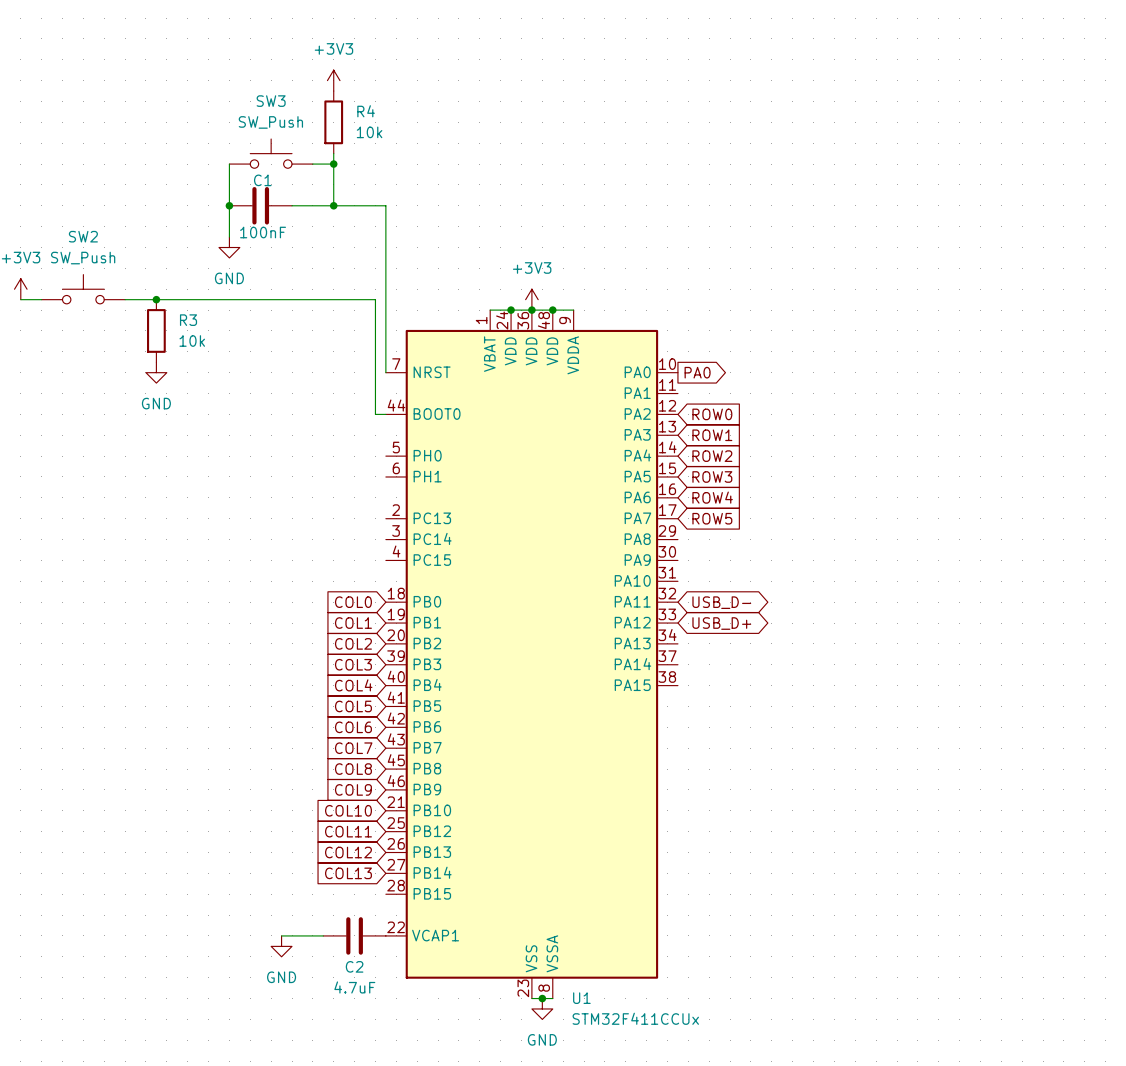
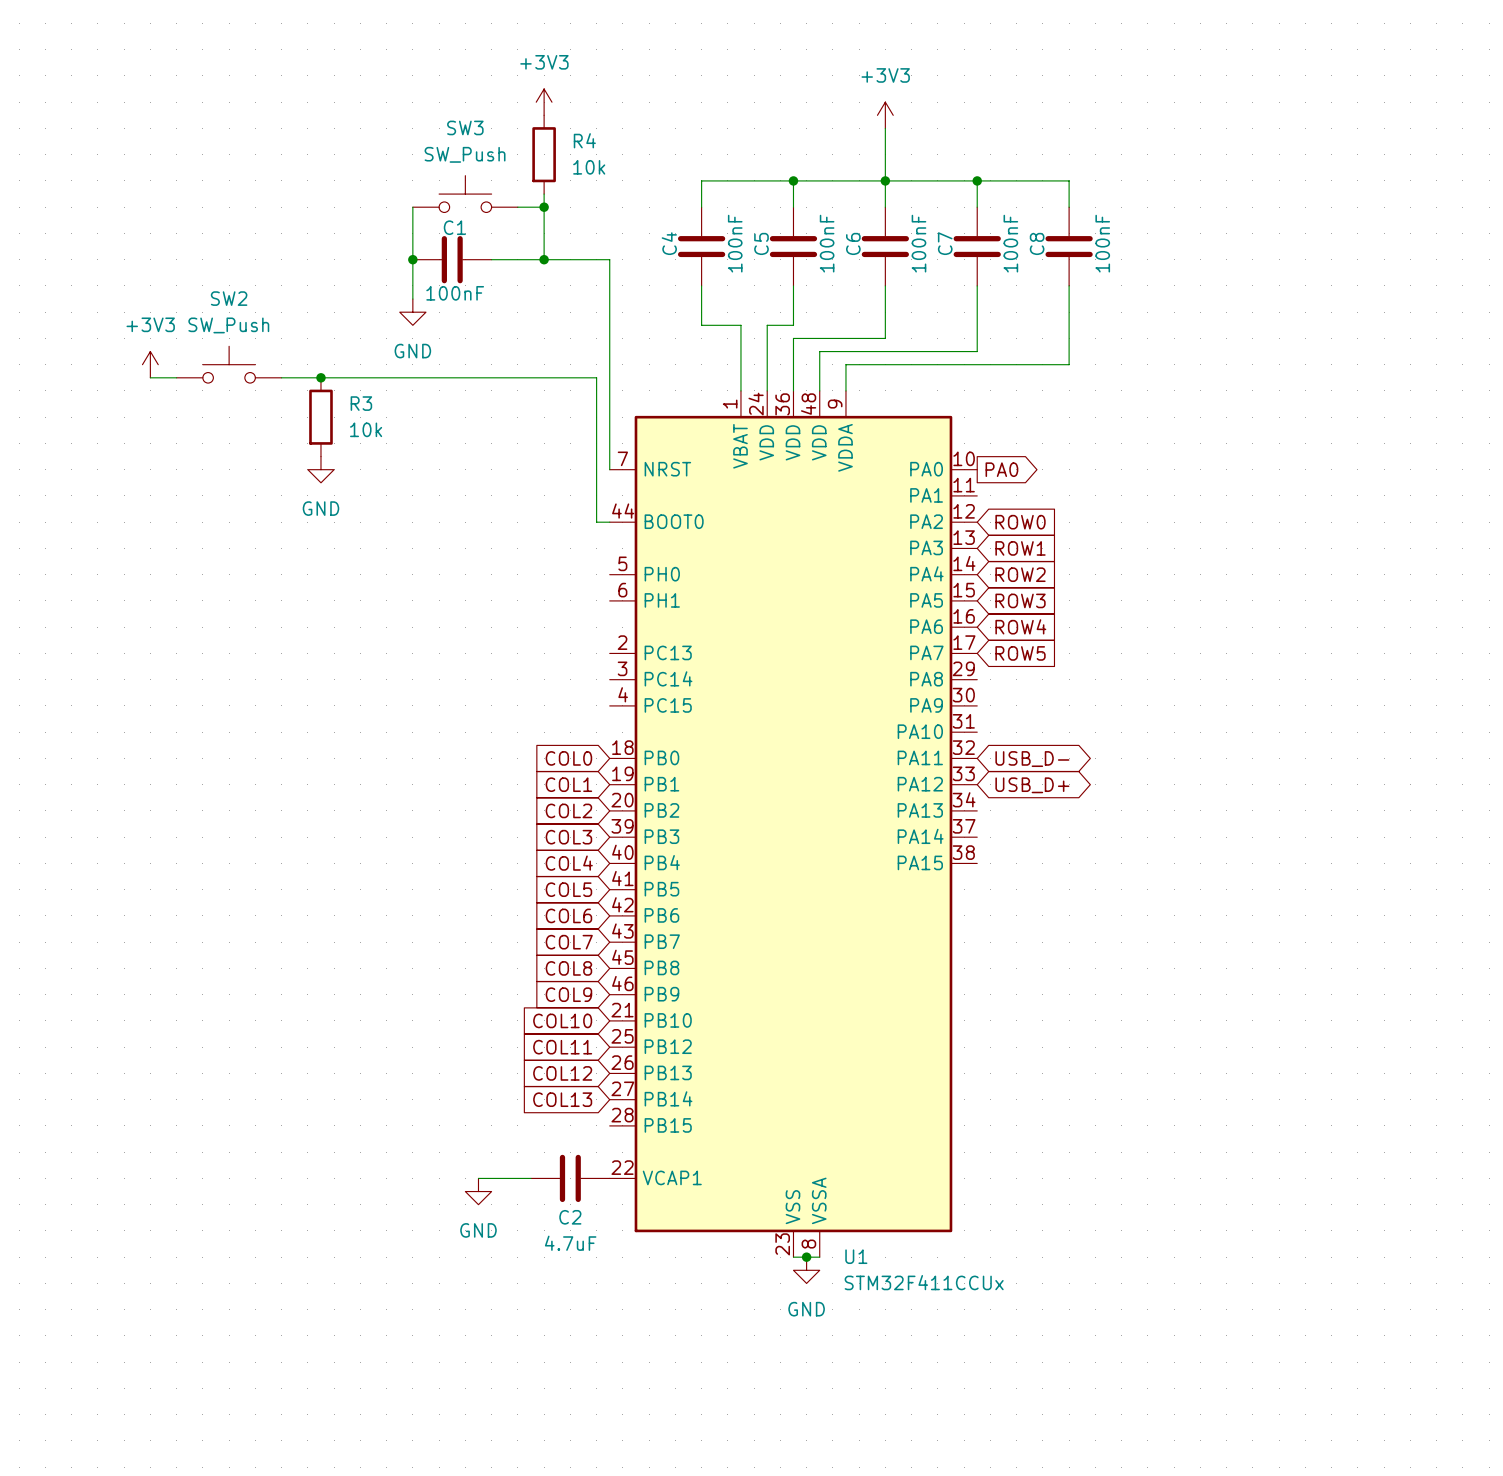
power symbol: none -> +3V3 (885, 115)
wire: none -> (885, 128) (885, 207)
wire: none -> (793, 180) (793, 207)
junction: none -> (793, 180)
junction: none -> (885, 180)
wire: none -> (977, 180) (977, 207)
junction: none -> (977, 180)
wire: none -> (701, 207) (701, 180) (1069, 180) (1069, 207)
C4: none -> 100nF (701, 246)
C5: none -> 100nF (793, 246)
C6: none -> 100nF (885, 246)
C7: none -> 100nF (977, 246)
C8: none -> 100nF (1069, 246)
wire: none -> (793, 285) (793, 325) (767, 325) (767, 390)
wire: none -> (885, 285) (885, 338) (793, 338) (793, 390)
wire: none -> (977, 285) (977, 351) (819, 351) (819, 390)
wire: none -> (1069, 285) (1069, 364) (845, 364) (845, 390)
power symbol: +3V3 (531, 299) -> none
wire: (490, 310) (573, 310) -> (740, 390) (740, 325) (701, 325) (701, 285)
junction: (511, 310) -> none
junction: (531, 310) -> none
junction: (552, 310) -> none

